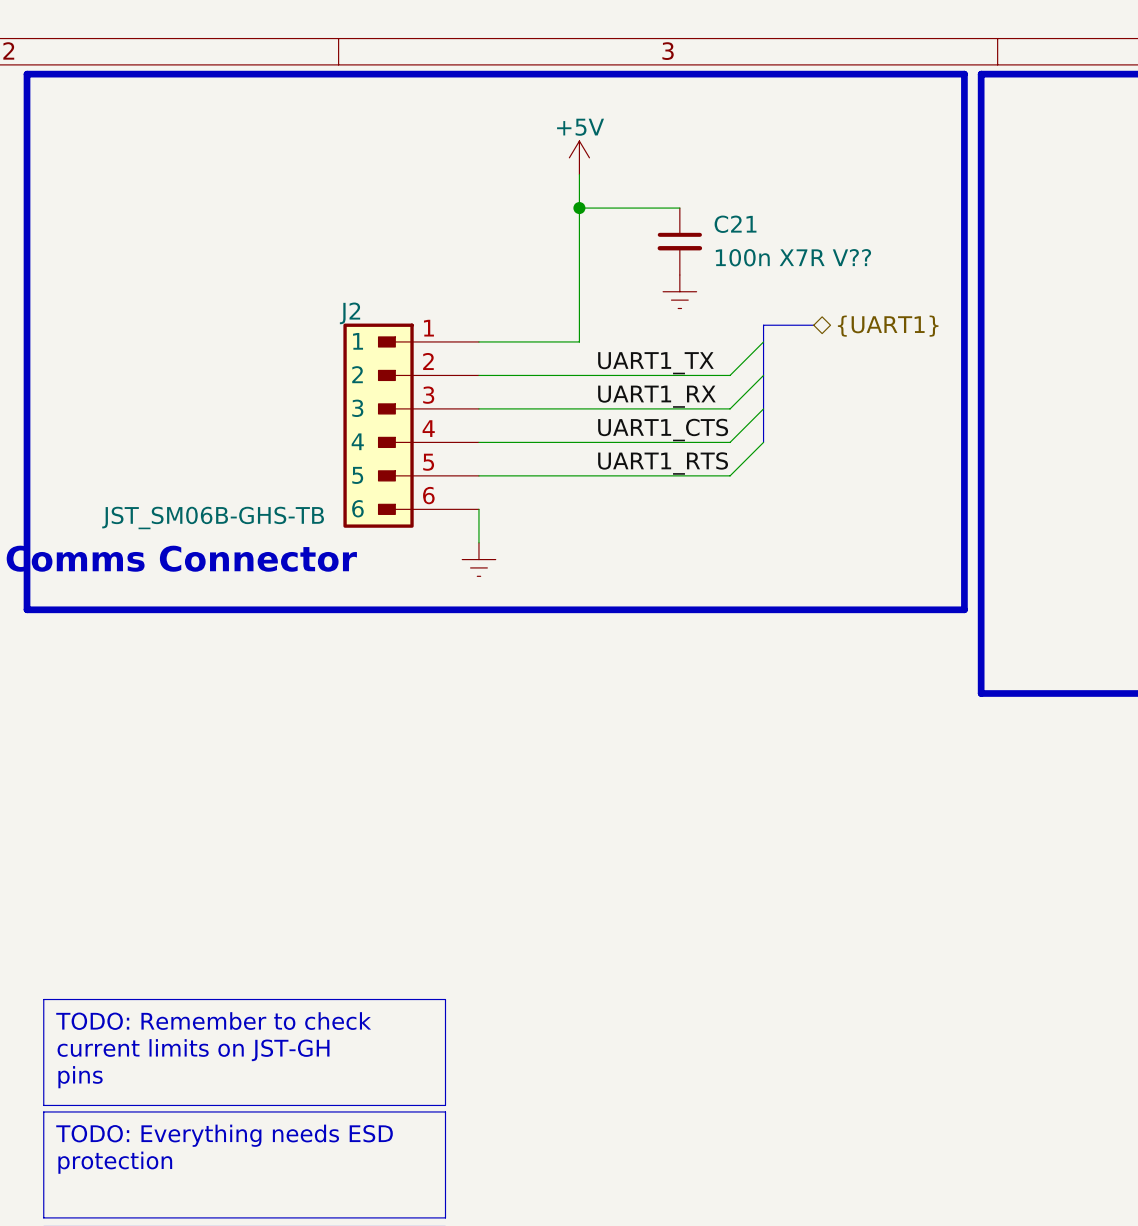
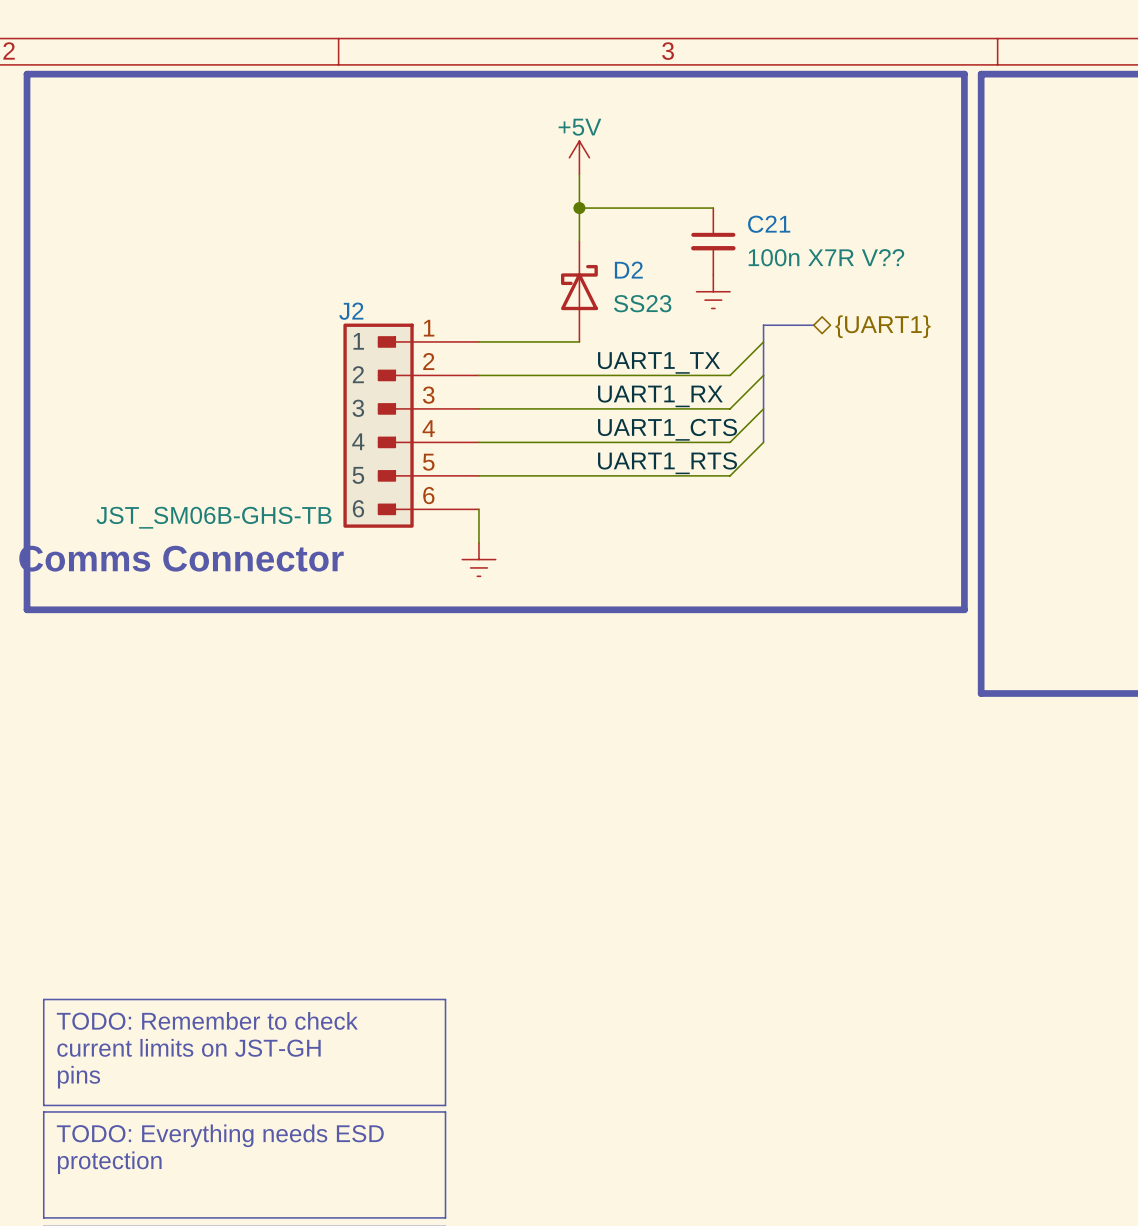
wire: none -> (679, 208) (713, 208)
C21 position: (679, 241) -> (713, 241)
D2: none -> SS23 (579, 291)
power symbol position: (679, 291) -> (713, 291)

